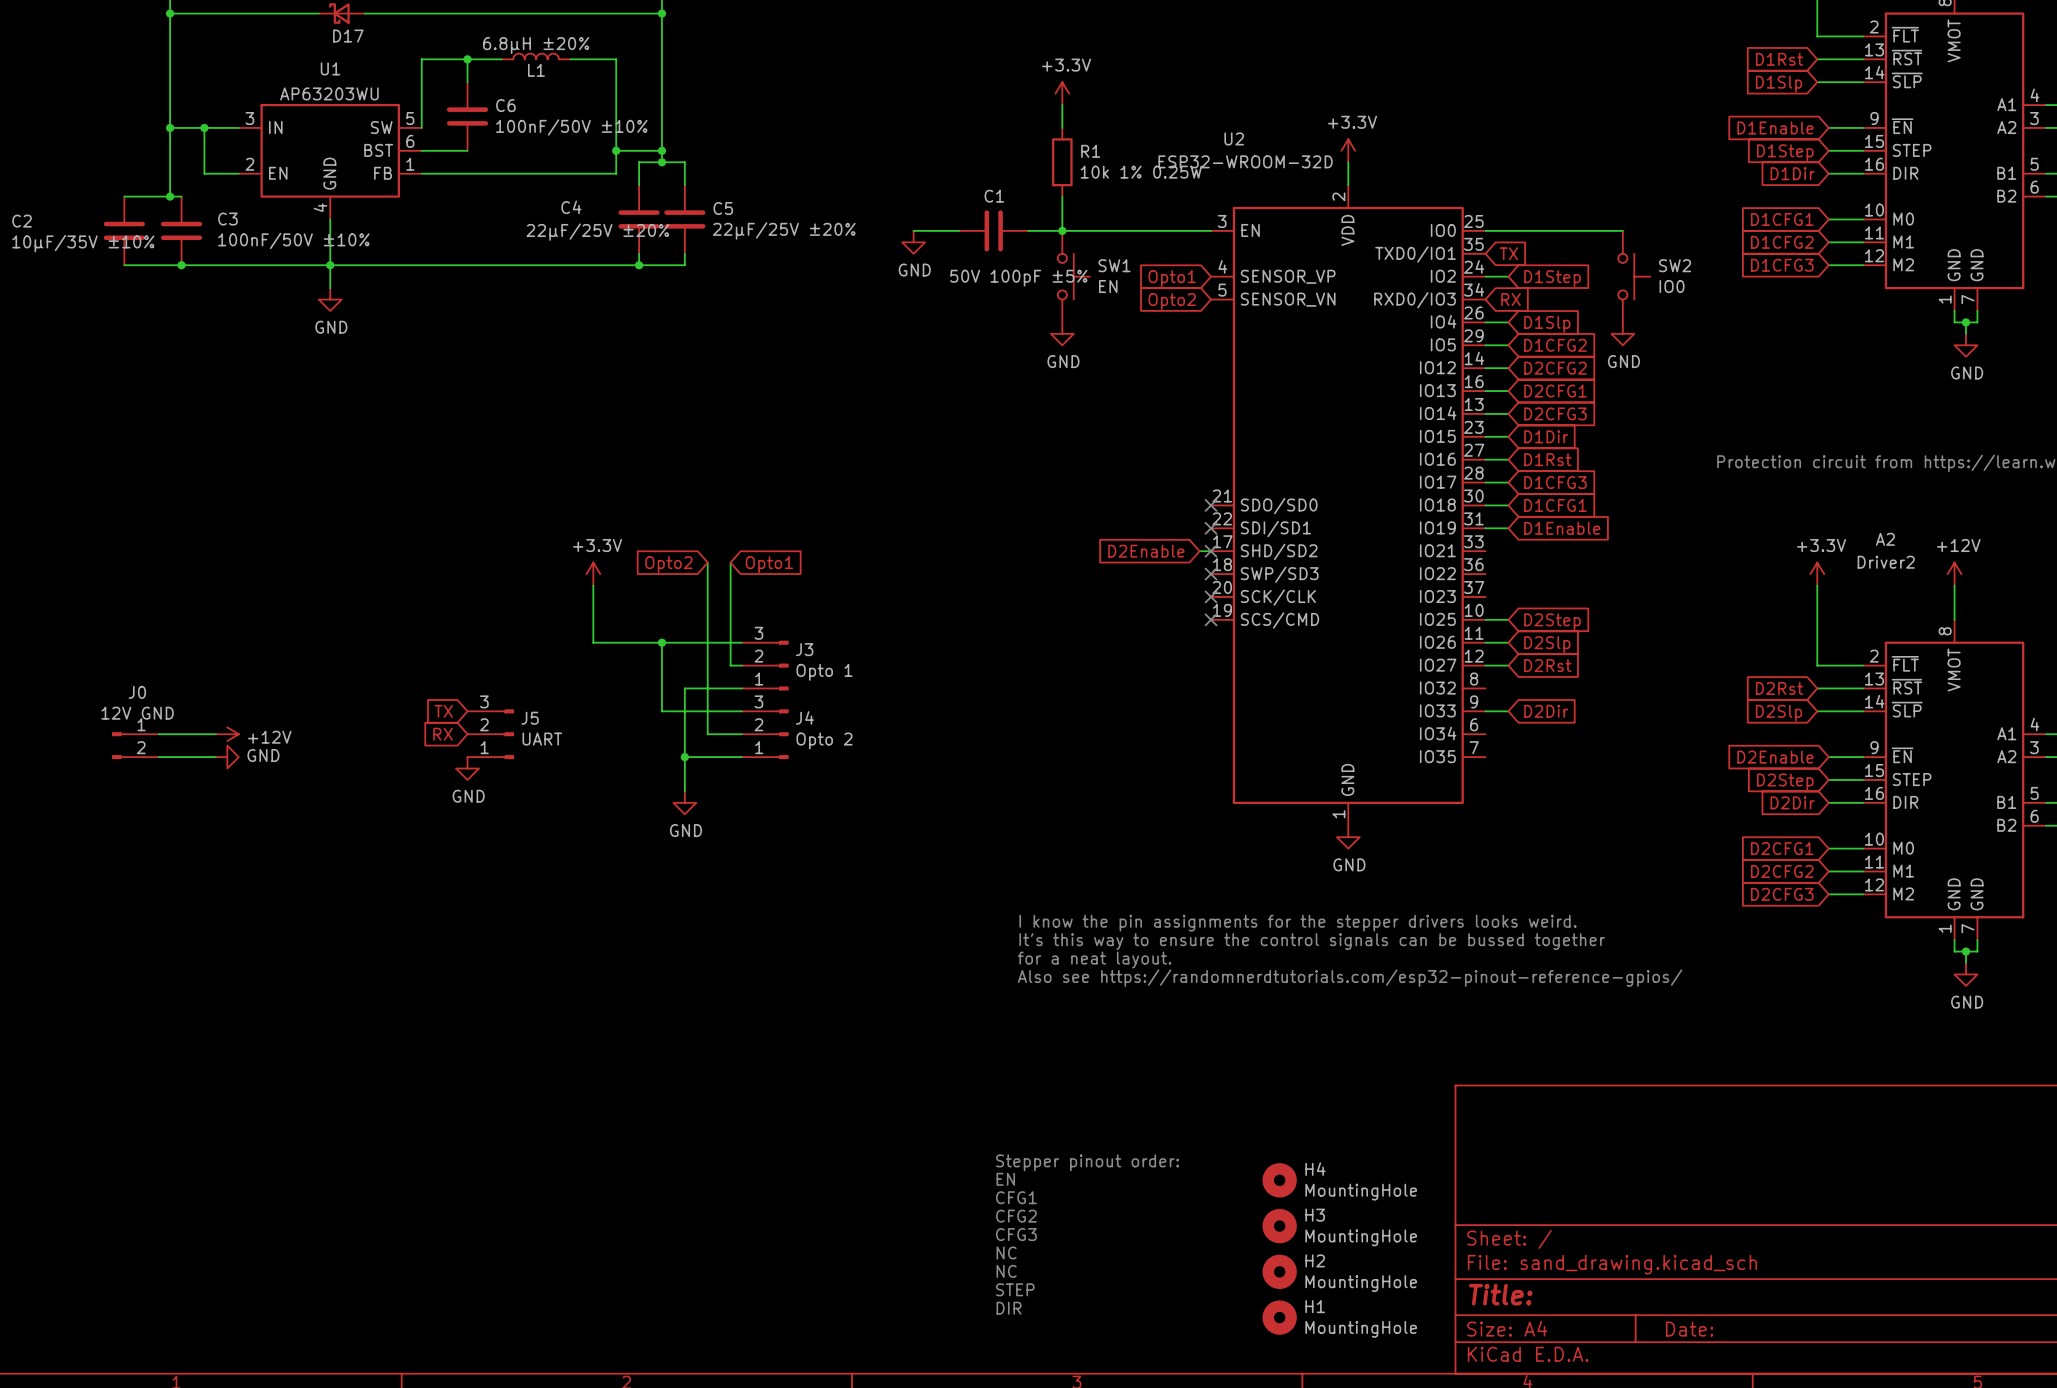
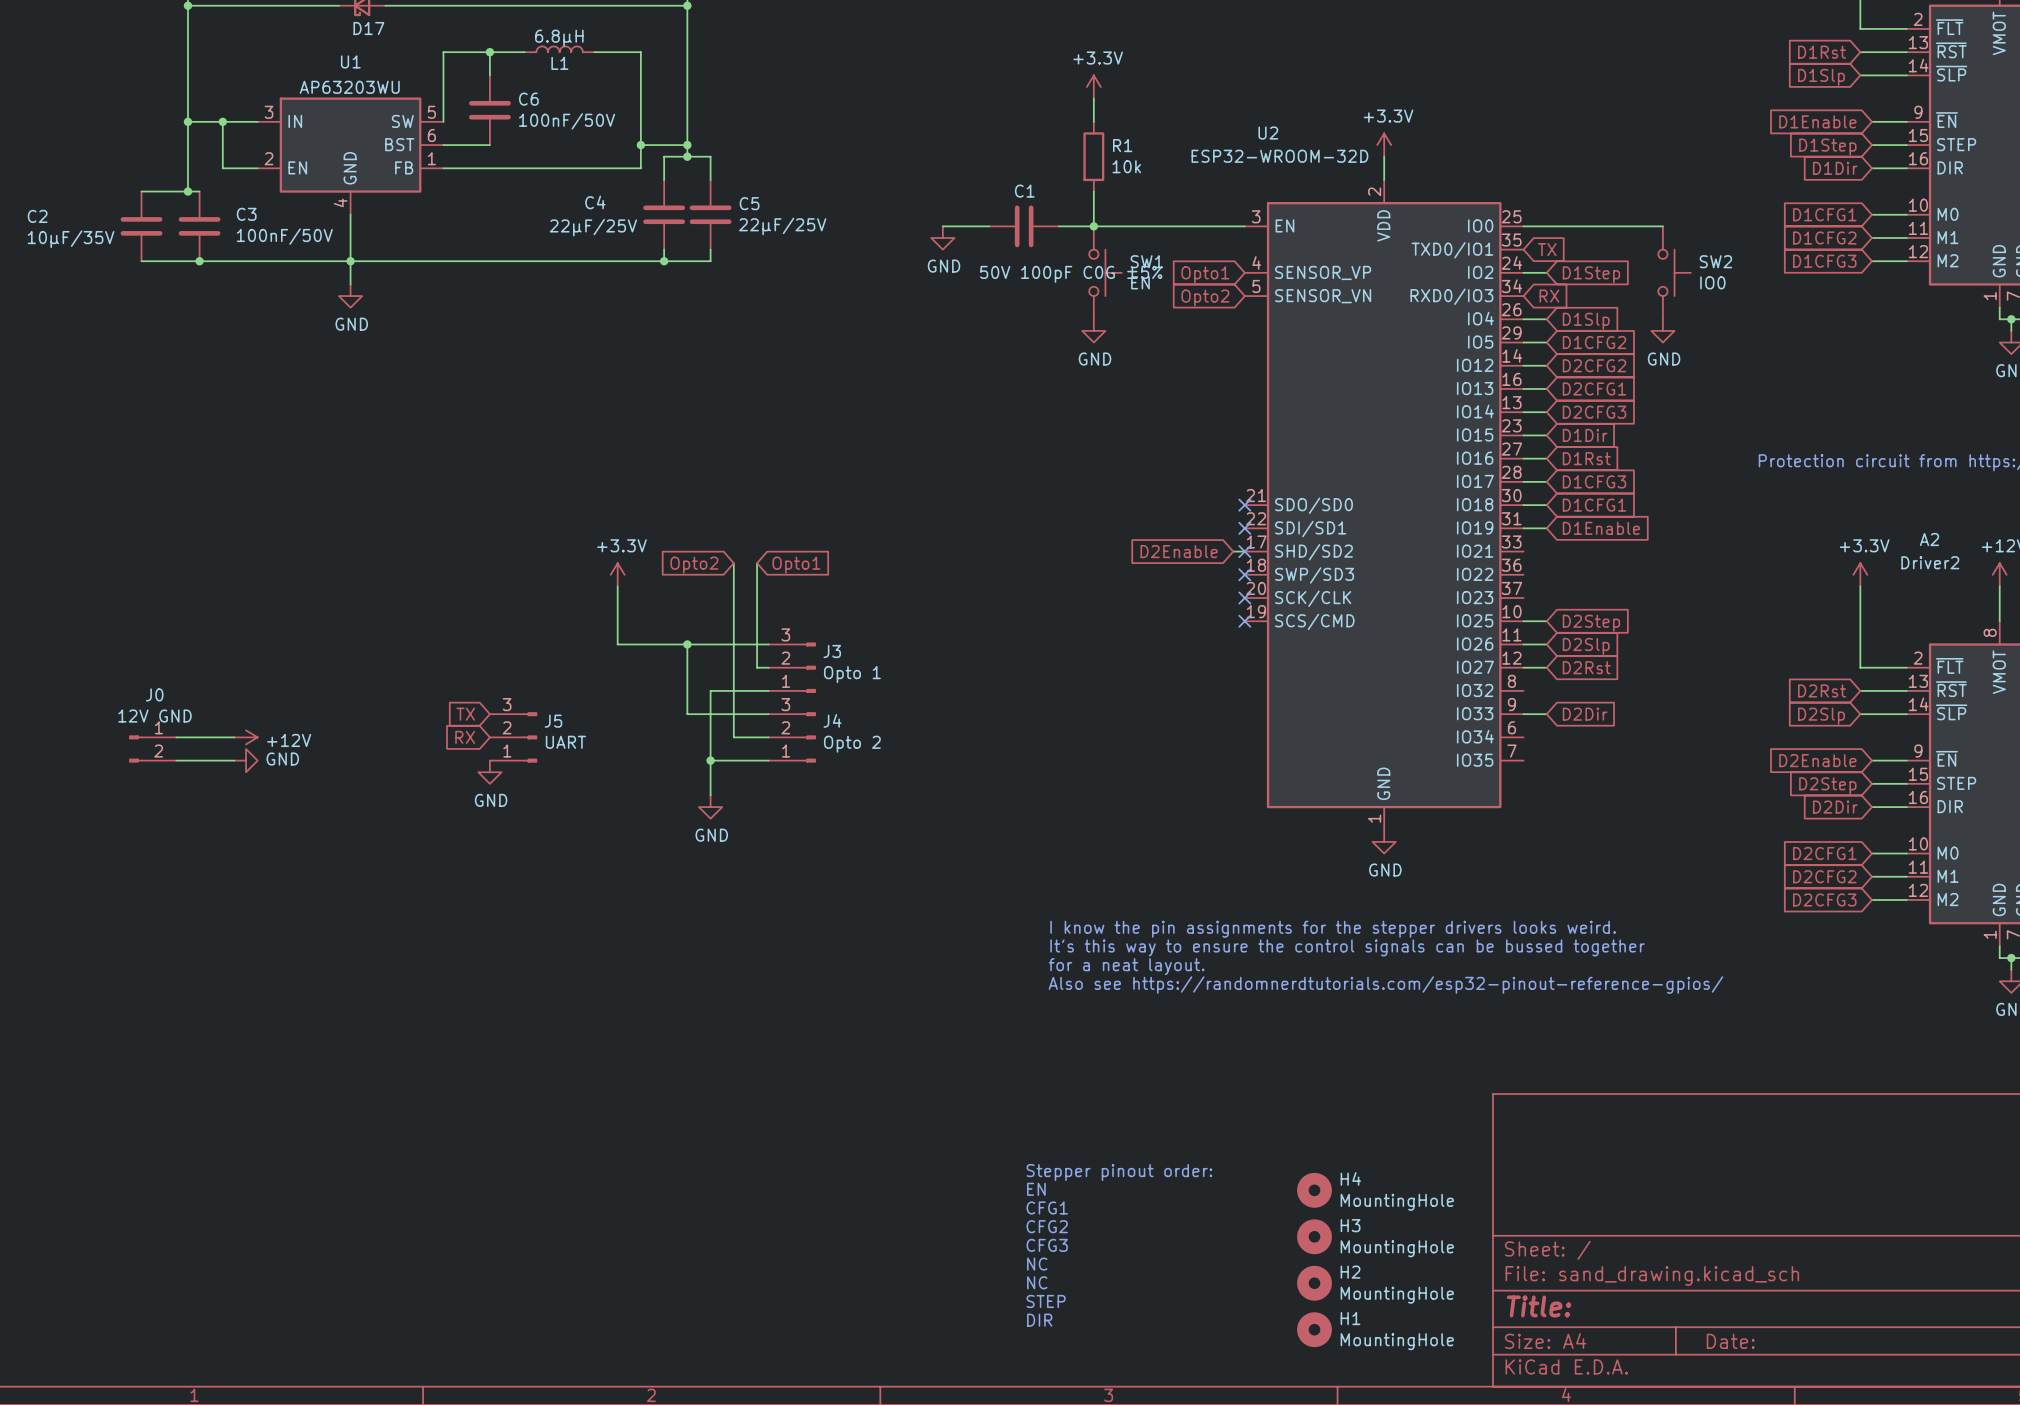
L1 value: 6.8µH ±20% (536, 45) -> 6.8µH (559, 38)
C6 value: 100nF/50V ±10% (571, 127) -> 100nF/50V (567, 121)
R1 value: 10k 1% 0.25W (1141, 172) -> 10k (1126, 166)
C5 value: 22µF/25V ±20% (784, 230) -> 22µF/25V (782, 226)
C4 value: 22µF/25V ±20% (597, 232) -> 22µF/25V (593, 227)
C3 value: 100nF/50V ±10% (293, 240) -> 100nF/50V (284, 236)
C2 value: 10µF/35V ±10% (83, 243) -> 10µF/35V (71, 239)
C1 value: 50V 100pF ±5% (1018, 278) -> 50V 100pF C0G ±5% (1071, 274)

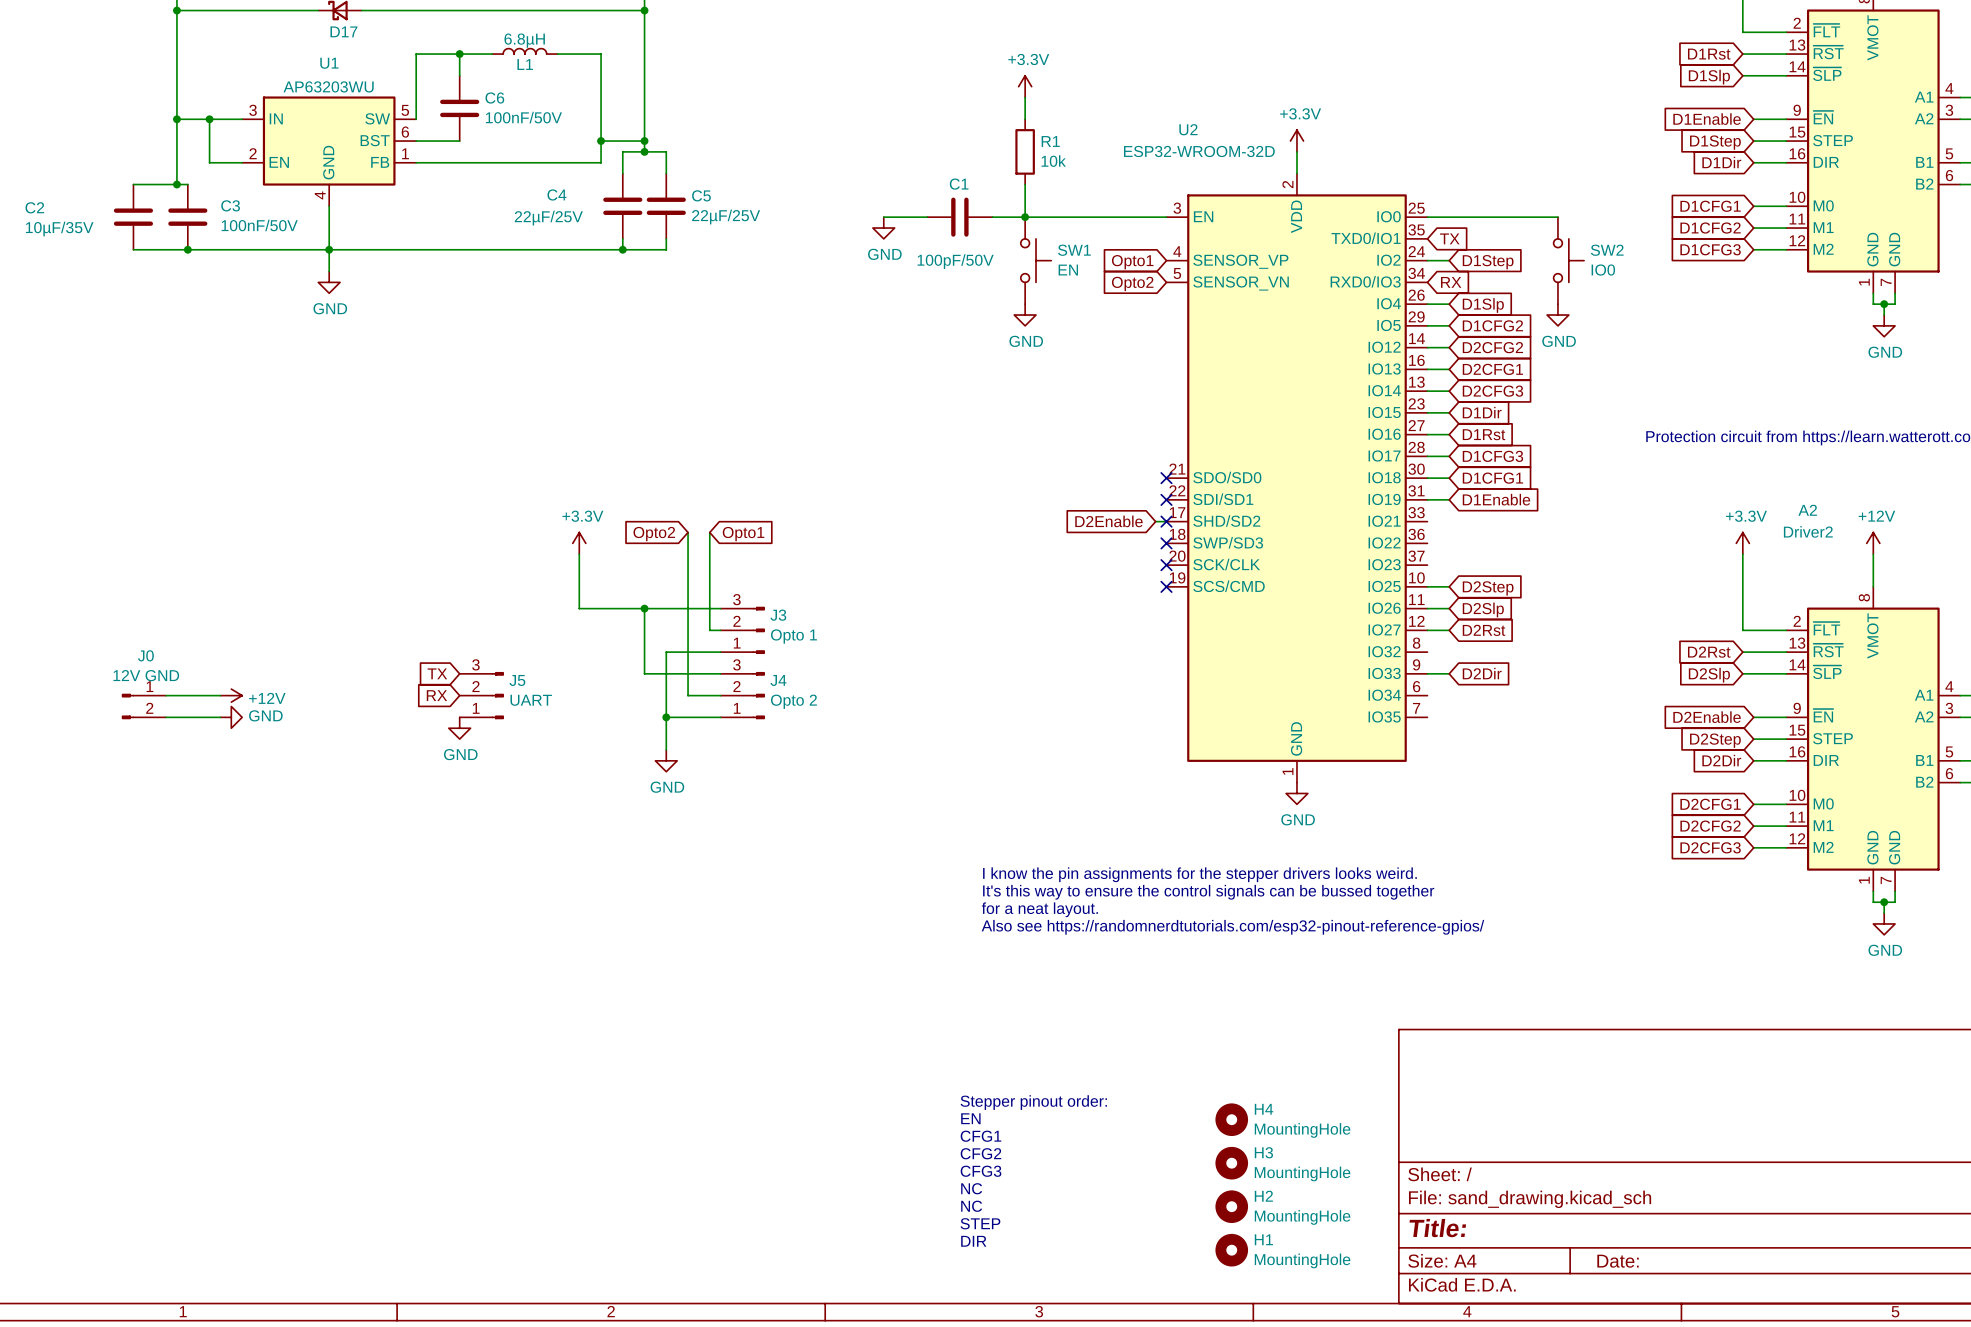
C1 value: 50V 100pF C0G ±5% (1071, 274) -> 100pF/50V (955, 261)

